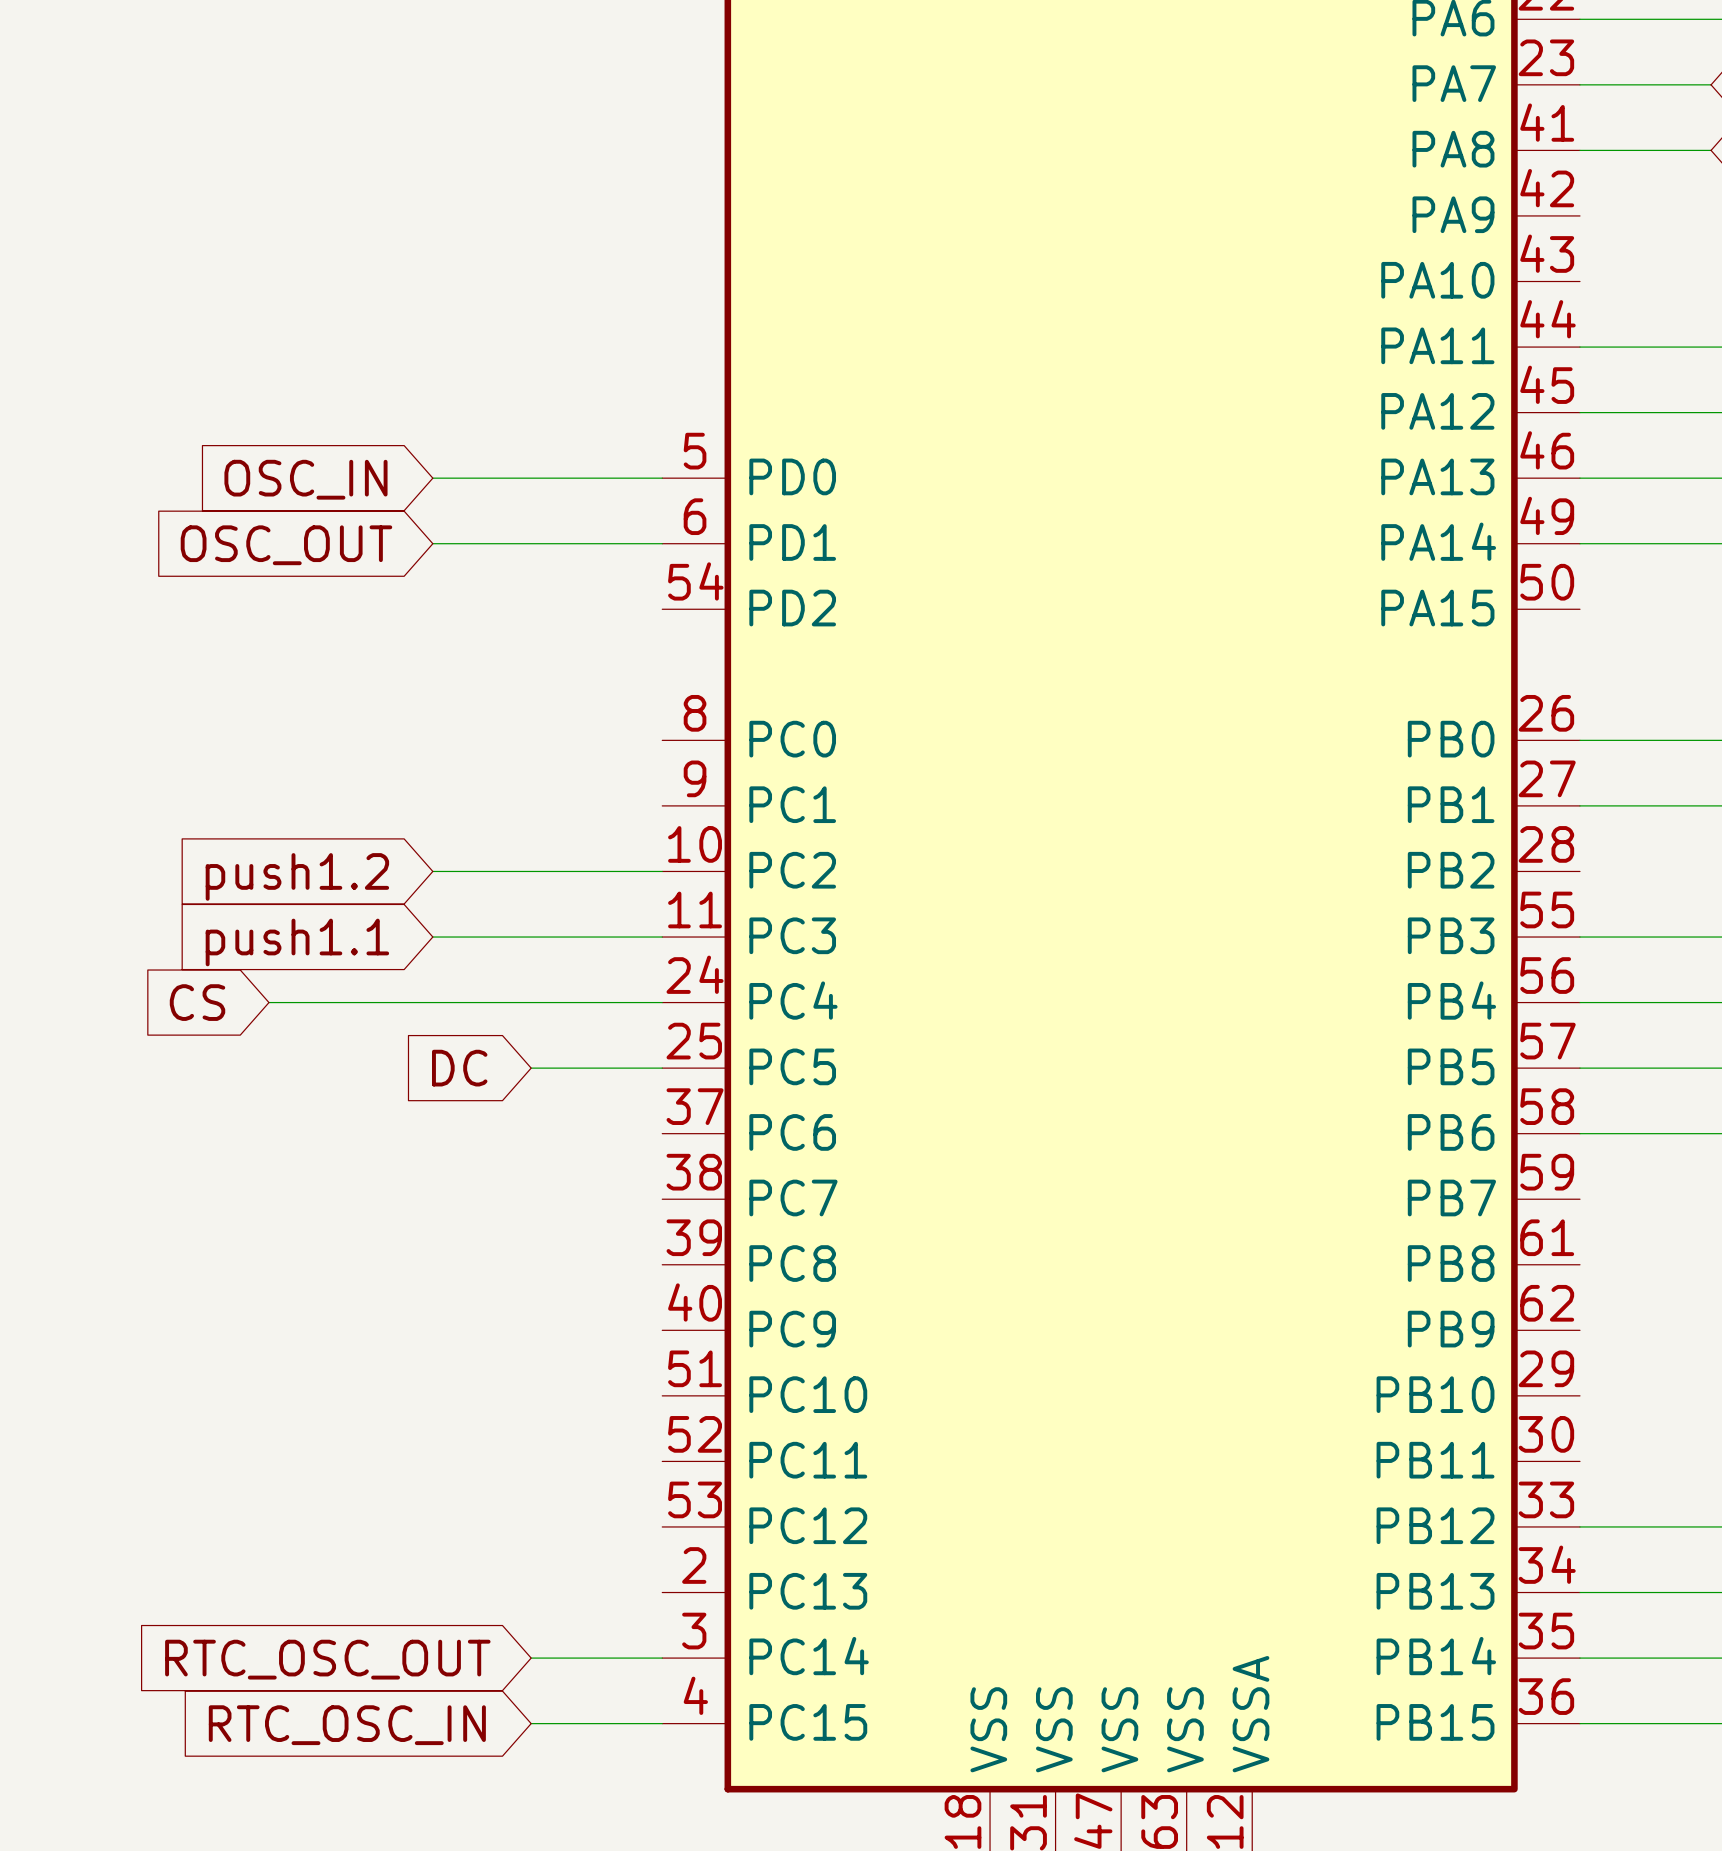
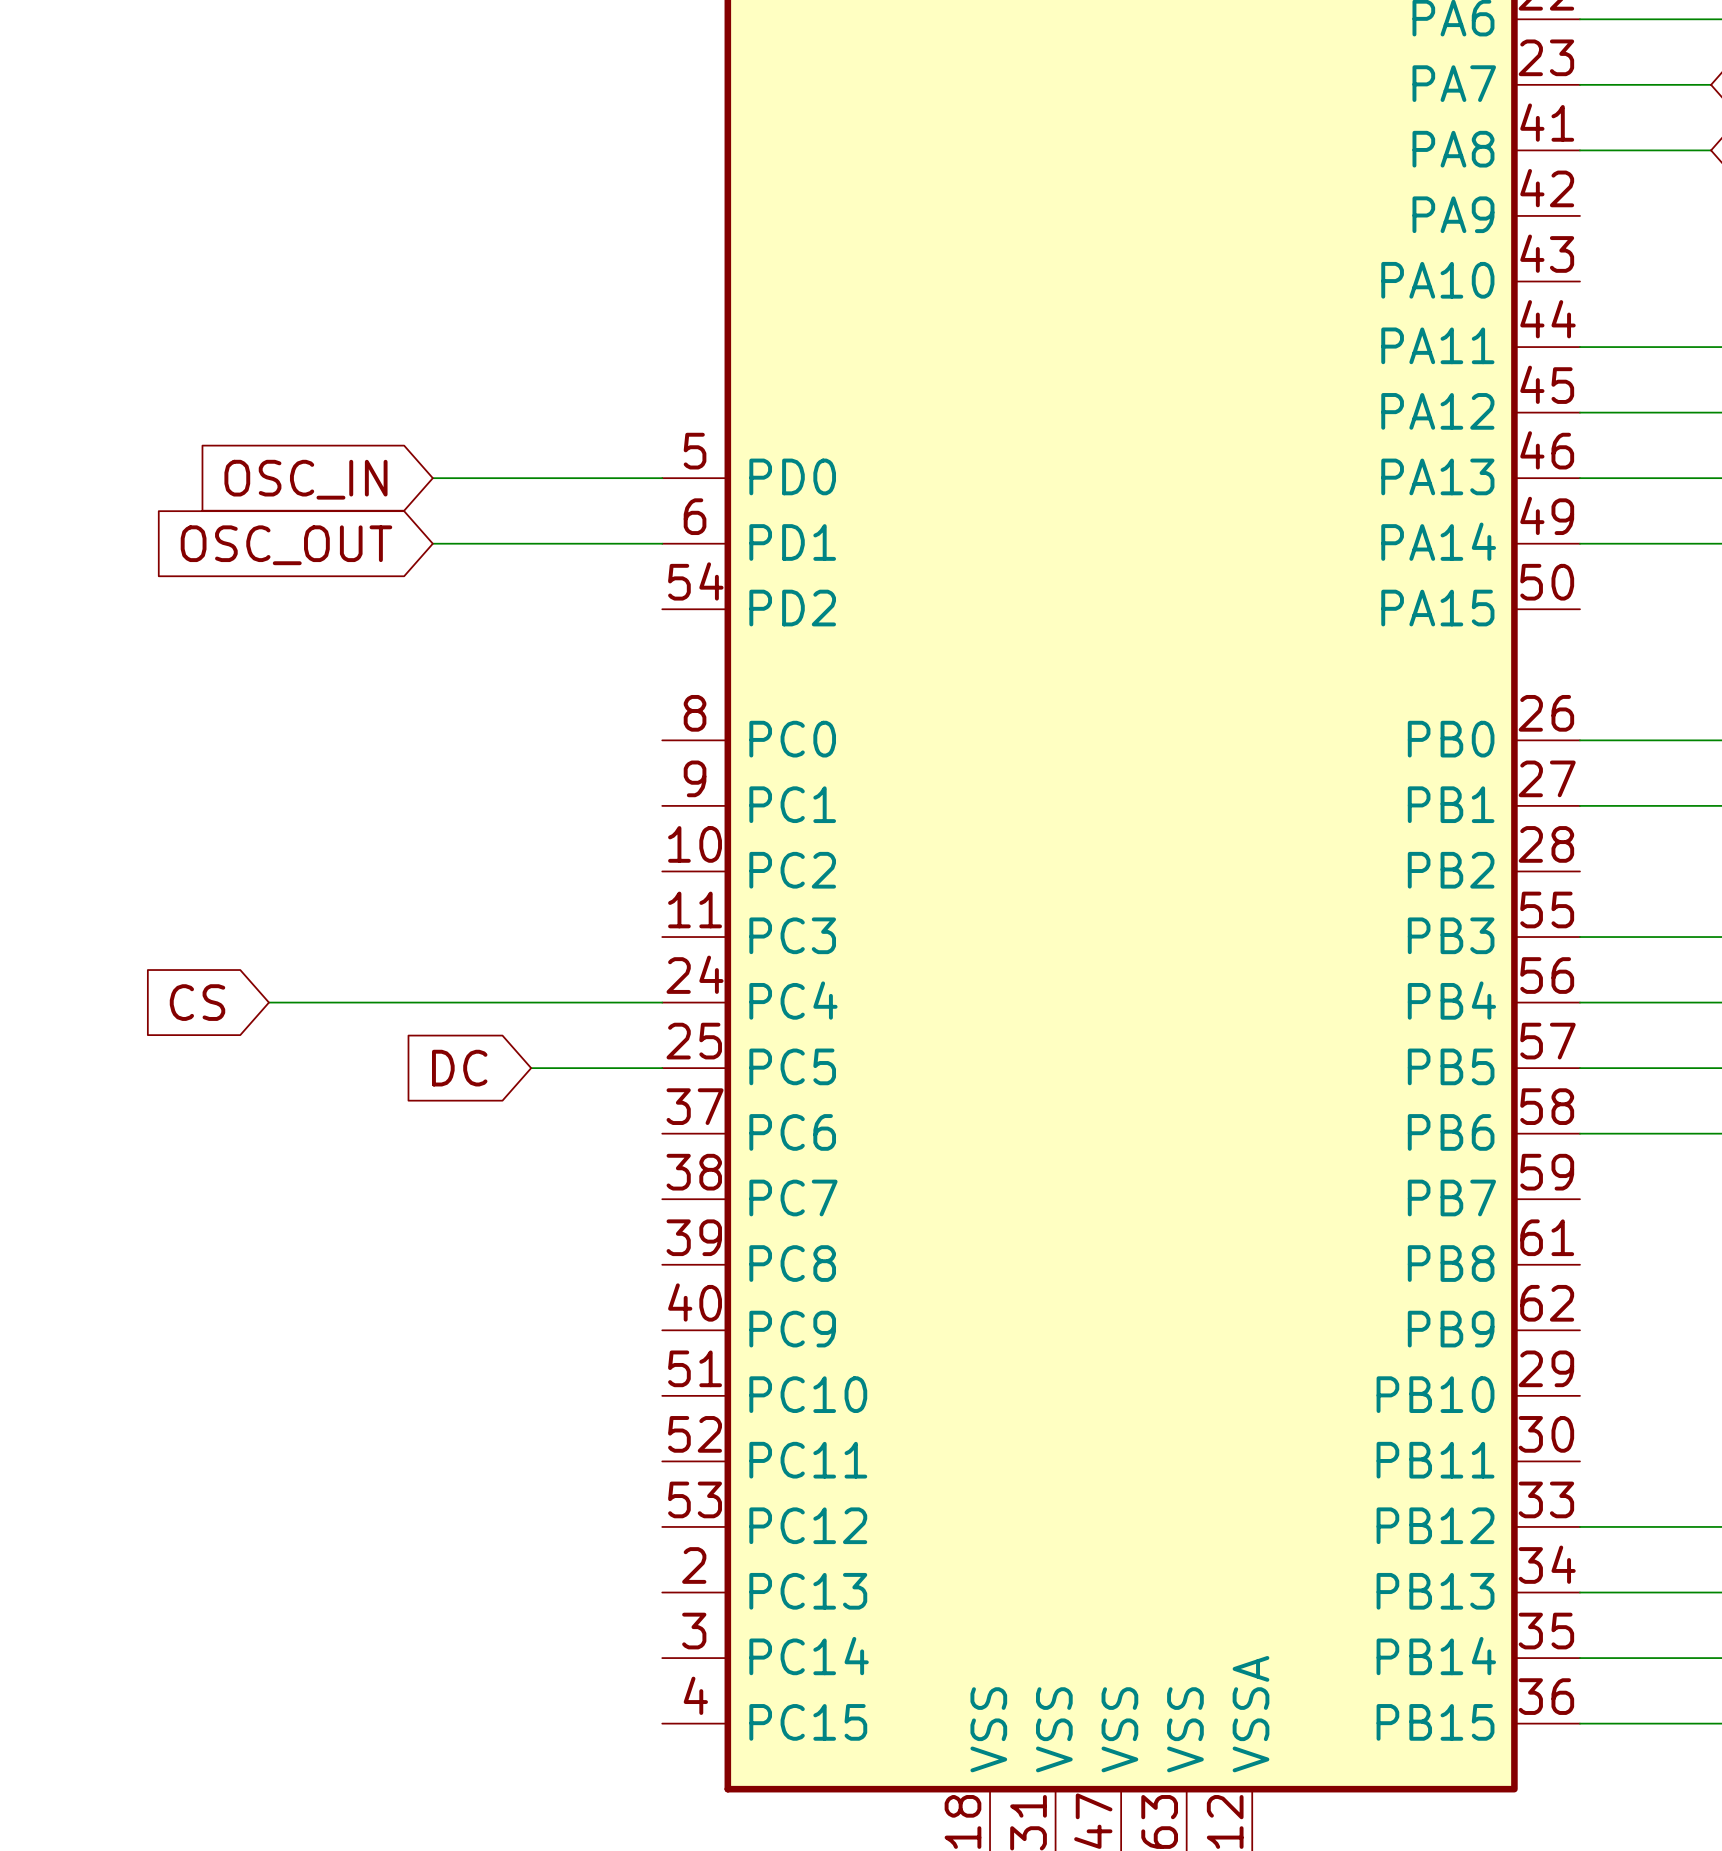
wire: (432, 871) (662, 871) -> none
global label: push1.2 (297, 876) -> none
wire: (432, 937) (662, 937) -> none
global label: push1.1 (297, 942) -> none
wire: (531, 1658) (662, 1658) -> none
global label: RTC_OSC_OUT (327, 1659) -> none
wire: (531, 1723) (662, 1723) -> none
global label: RTC_OSC_IN (347, 1725) -> none

